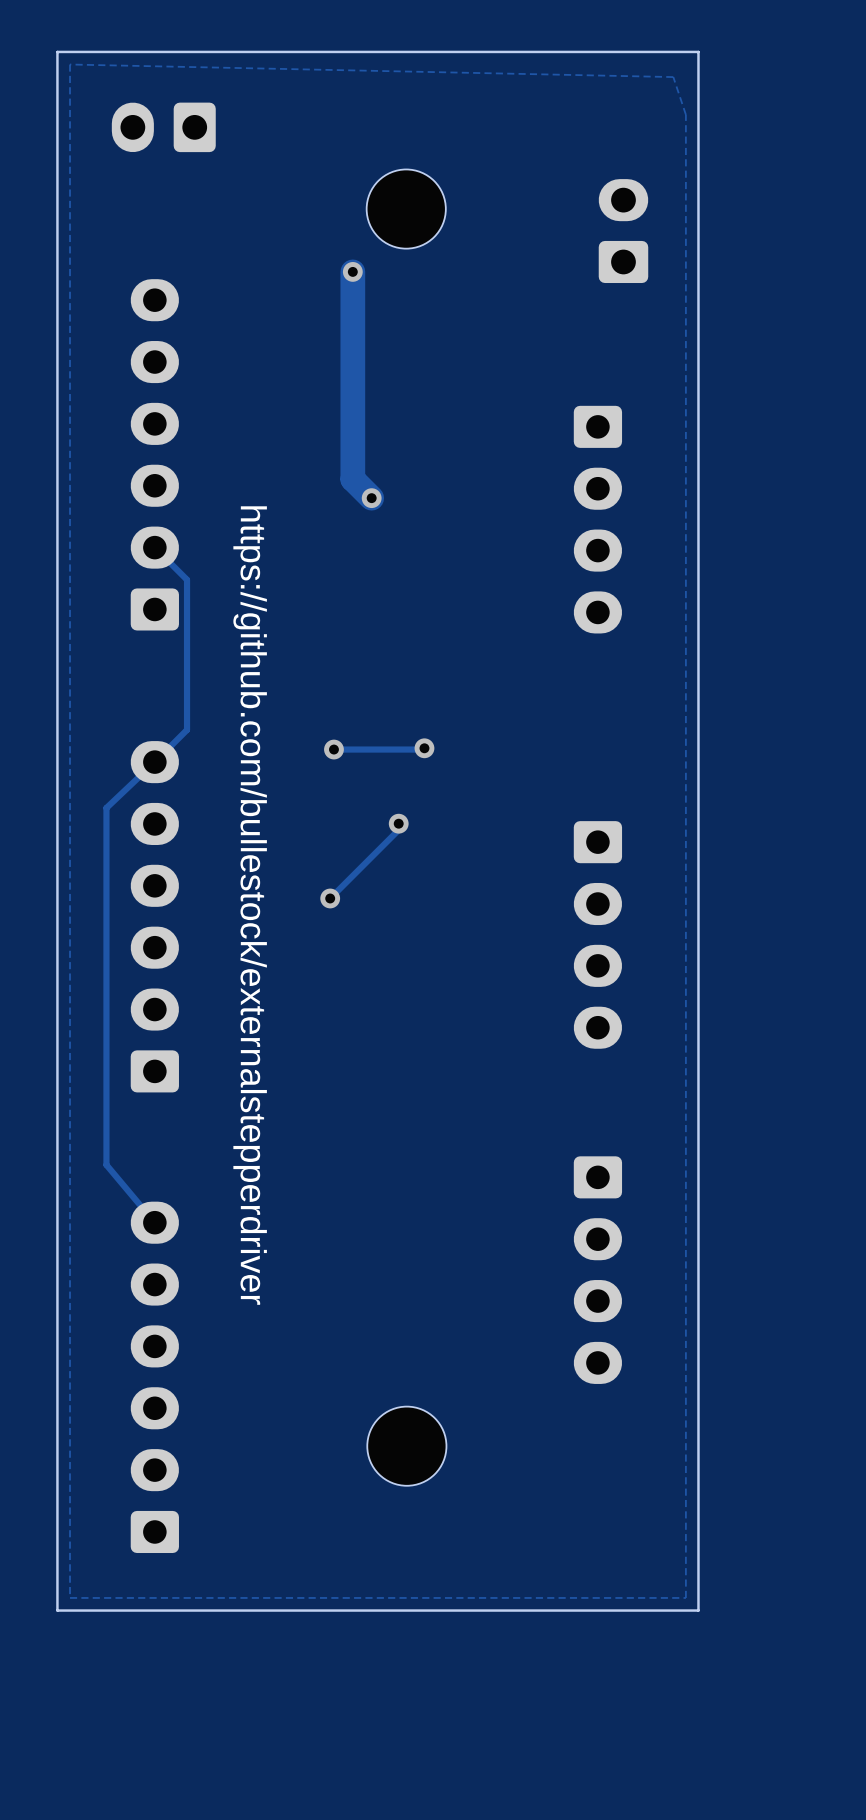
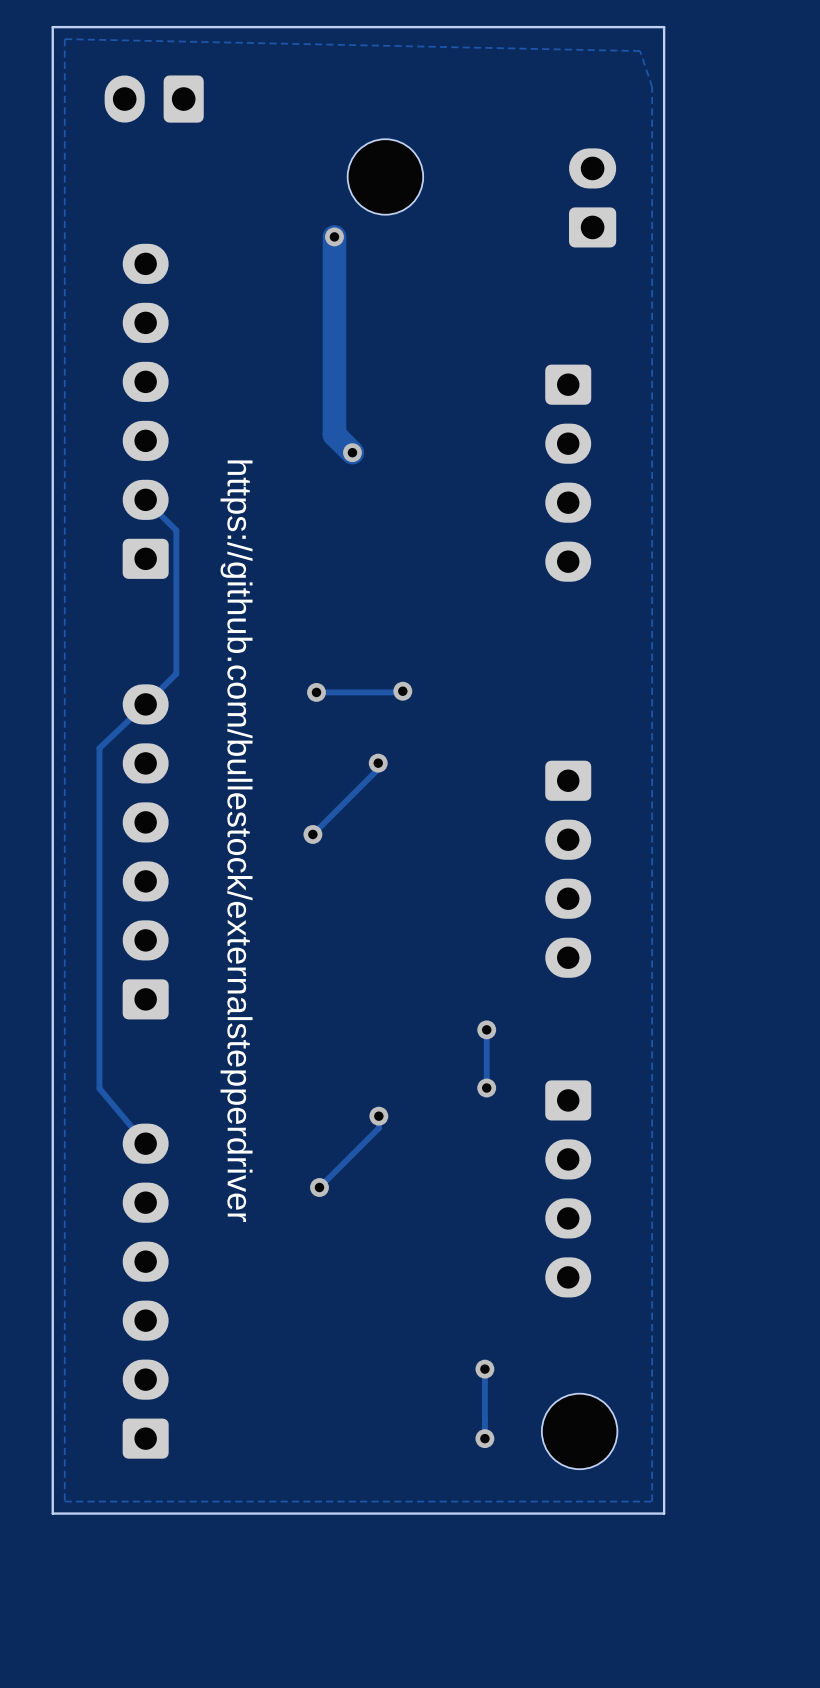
track: none -> (486, 1029) (486, 1088)
via: none -> (486, 1029)
via: none -> (486, 1088)
track: none -> (378, 1116) (378, 1128) (319, 1187)
via: none -> (378, 1116)
via: none -> (319, 1187)
part position: (406, 1446) -> (579, 1431)
track: none -> (484, 1369) (484, 1438)
via: none -> (484, 1369)
via: none -> (484, 1438)

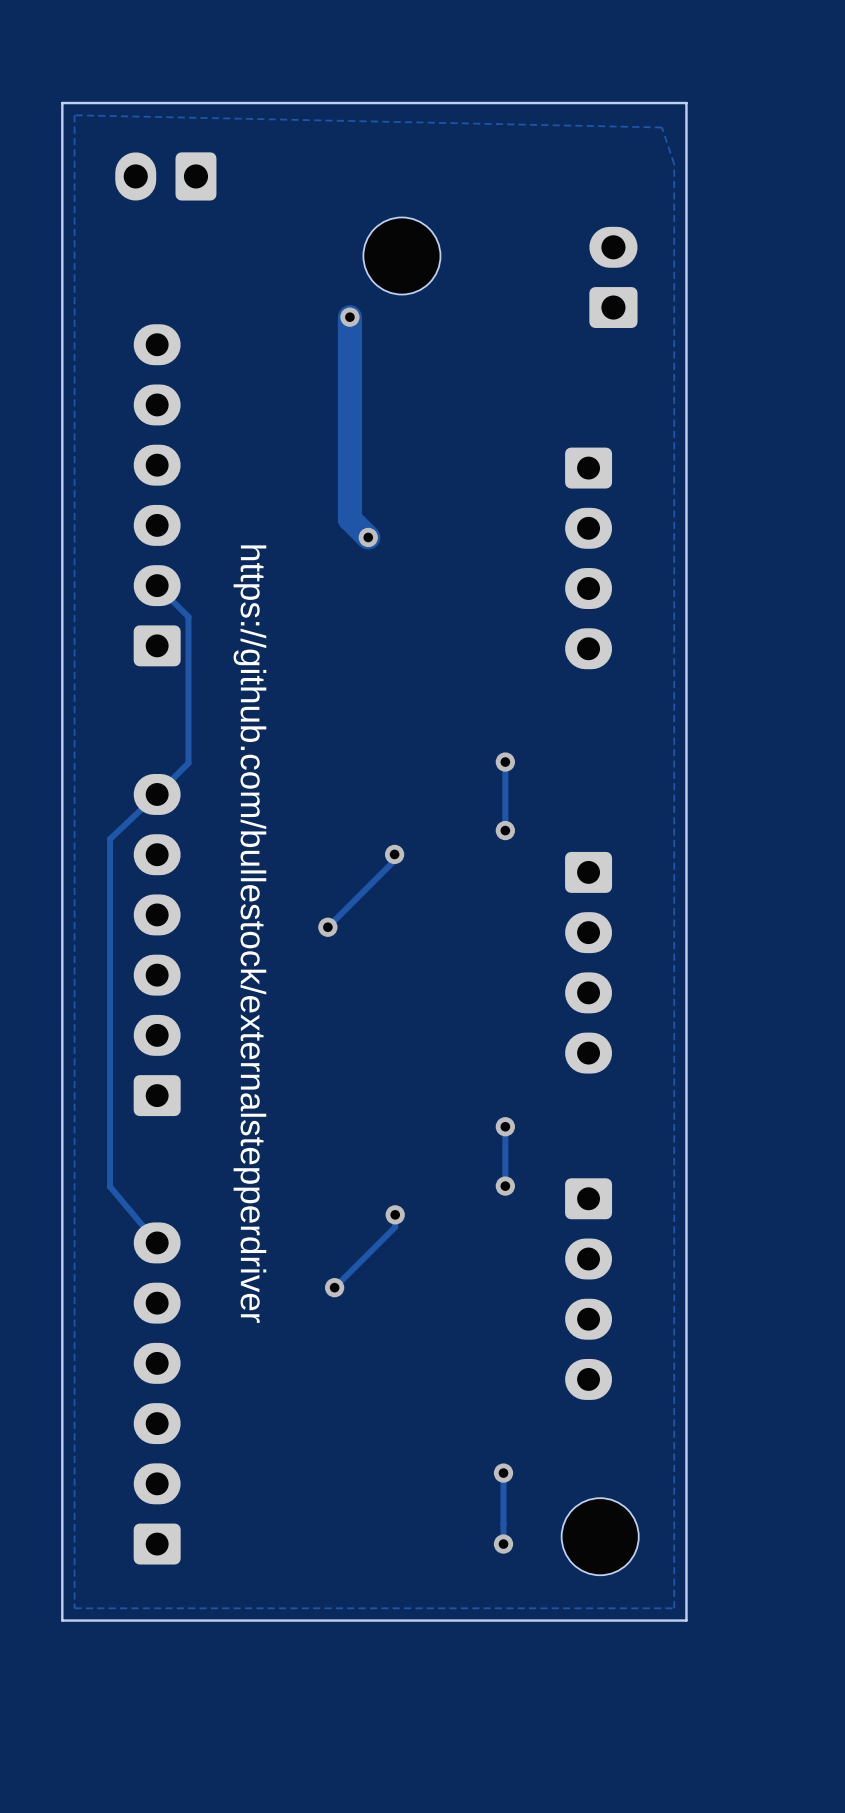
track: none -> (505, 762) (505, 830)
via: none -> (505, 762)
track: (402, 691) (316, 692) -> none
via: (402, 691) -> none
via: (316, 692) -> none
via: none -> (505, 830)

